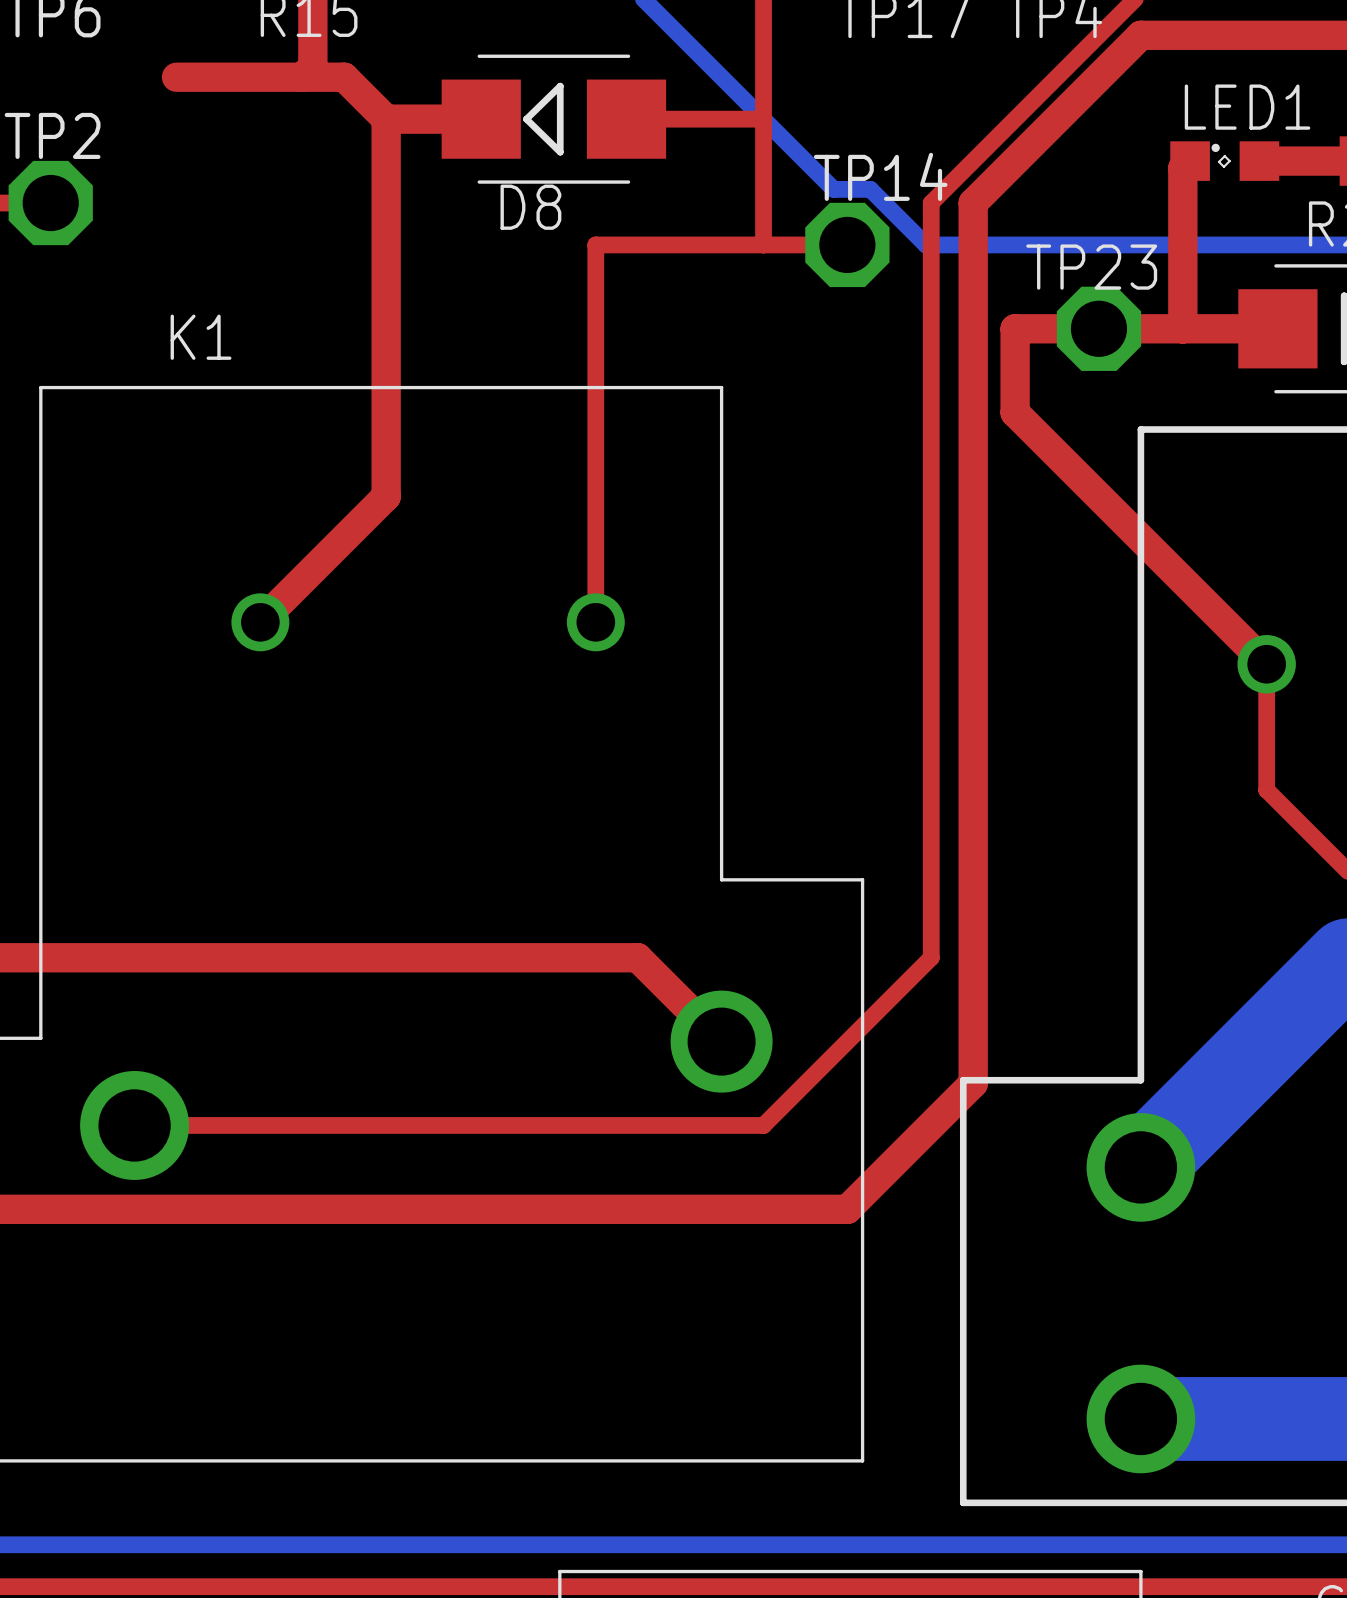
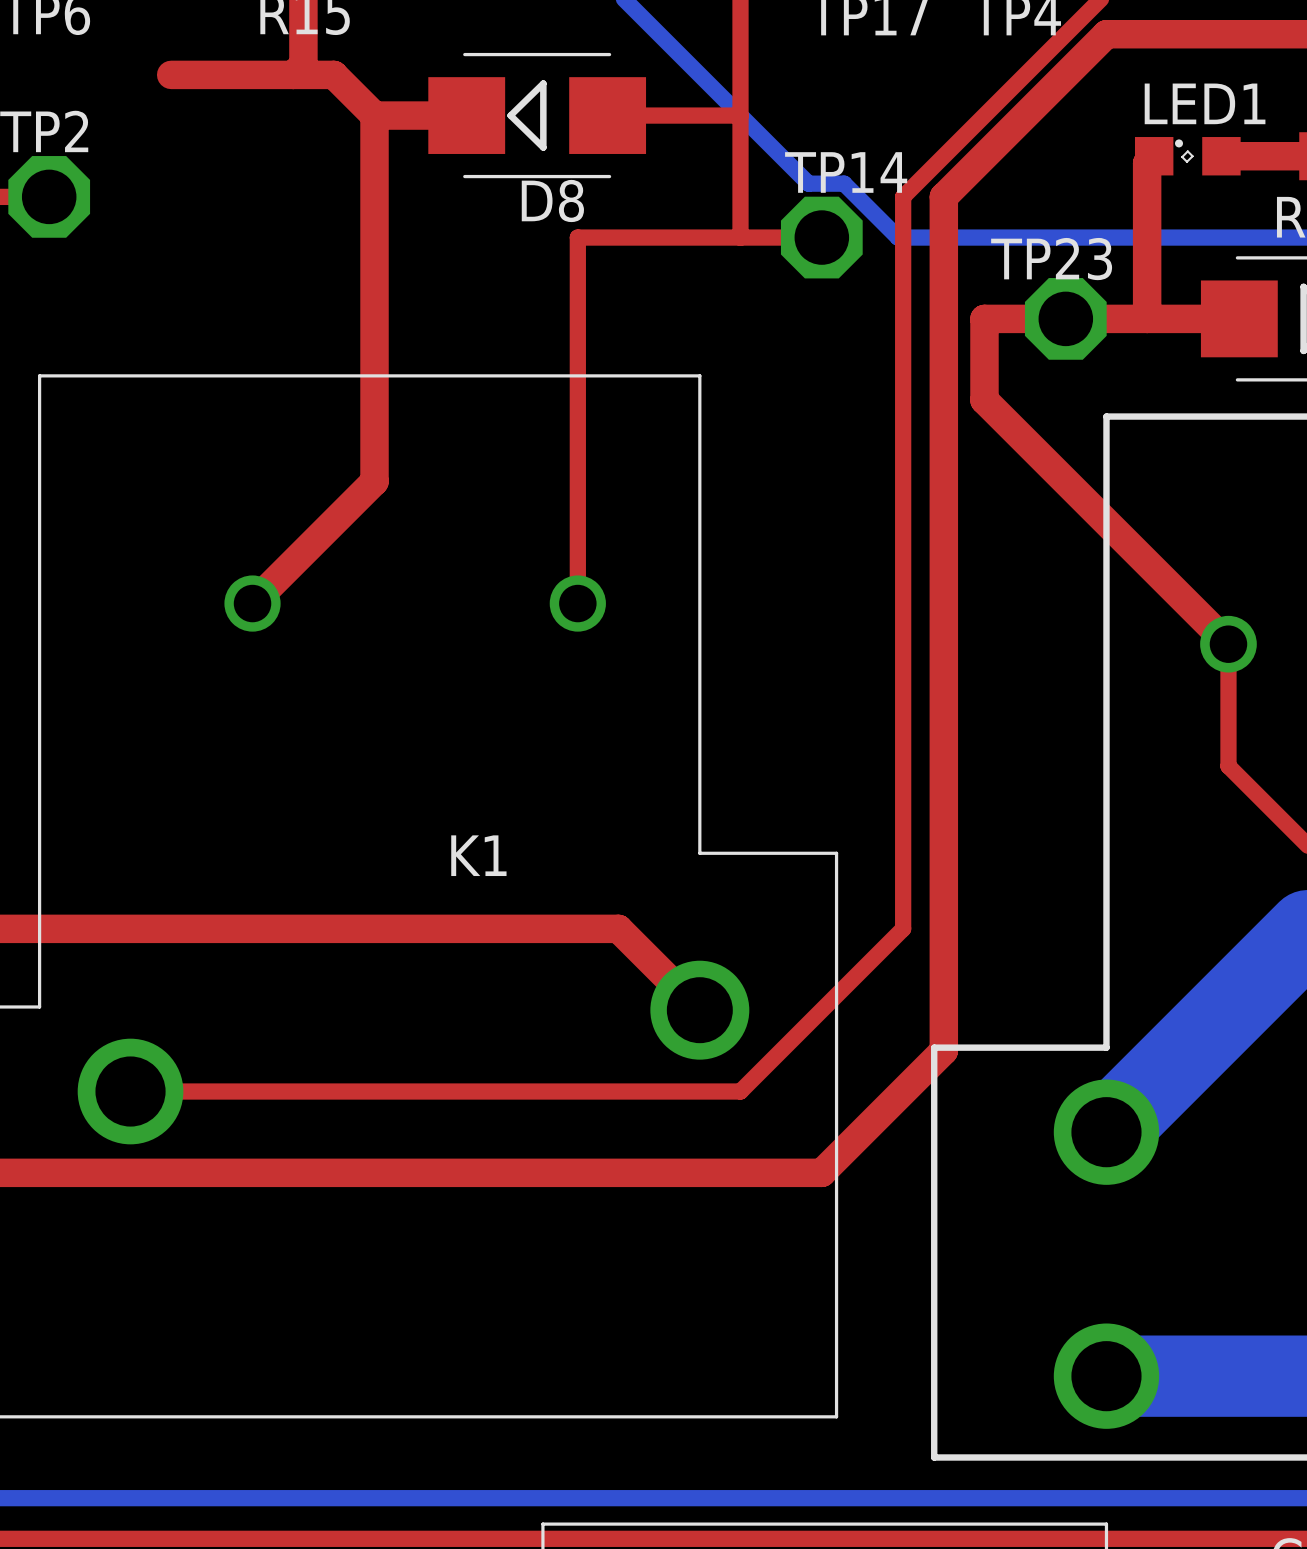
D8 name position: D8 (530, 207) -> D8 (552, 200)
K1 name position: K1 (201, 337) -> K1 (478, 855)

